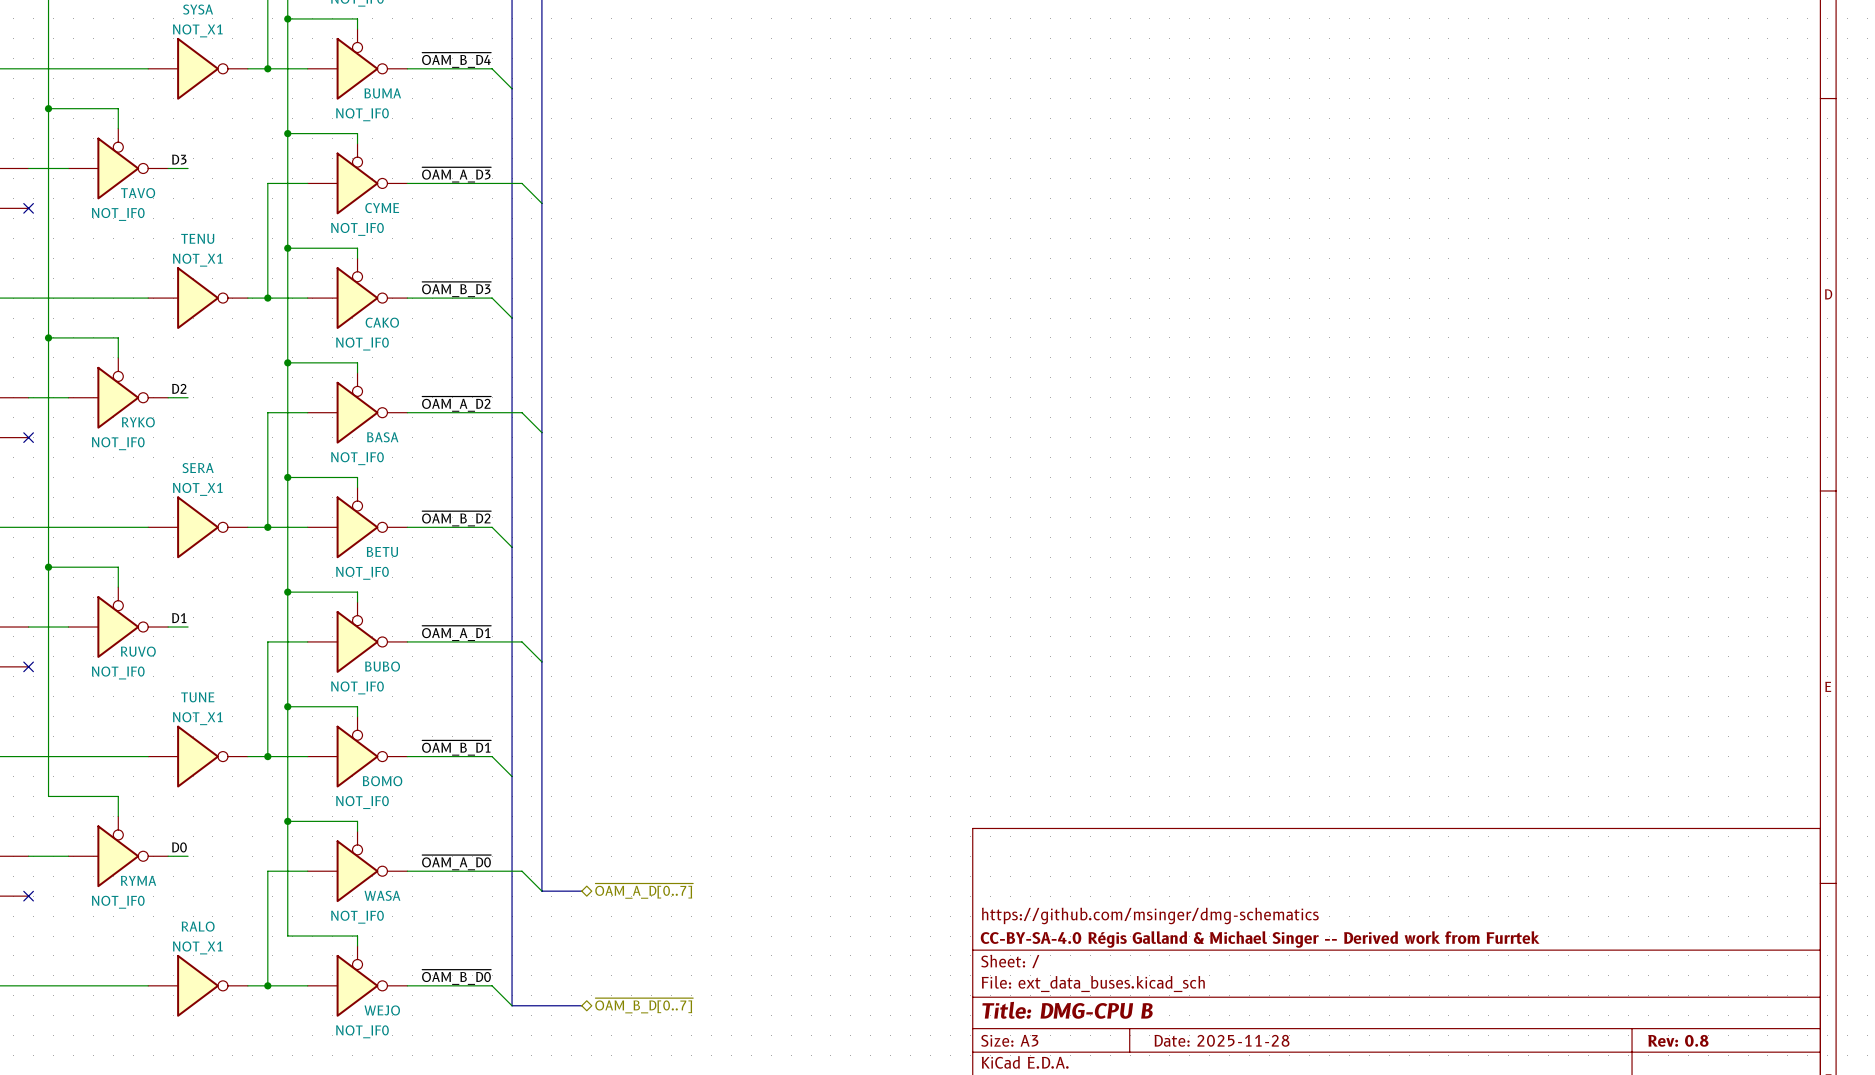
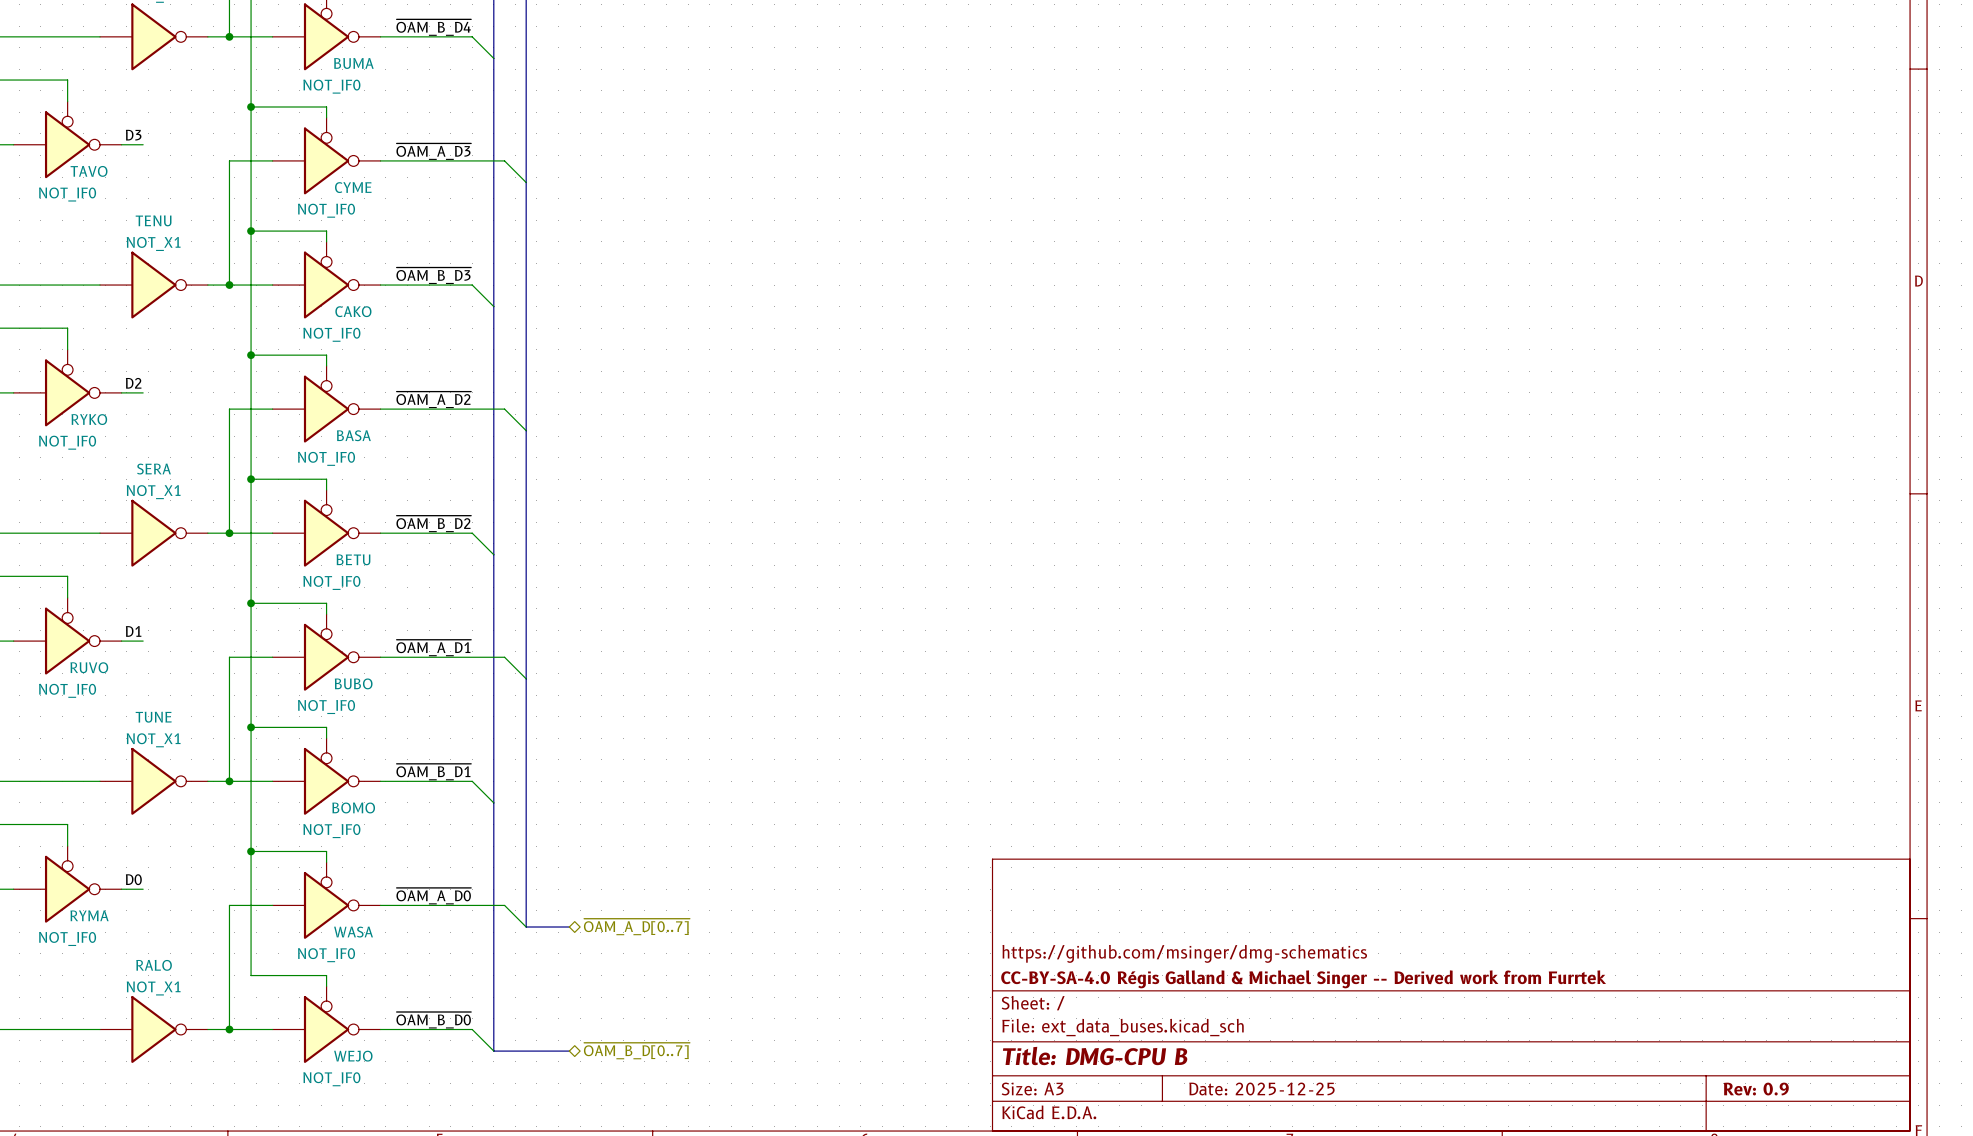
title block: Date: 2025-11-28 (1222, 1040) -> Date: 2025-12-25 (1261, 1088)
title block: Rev: 0.8 (1678, 1040) -> Rev: 0.9 (1756, 1089)

